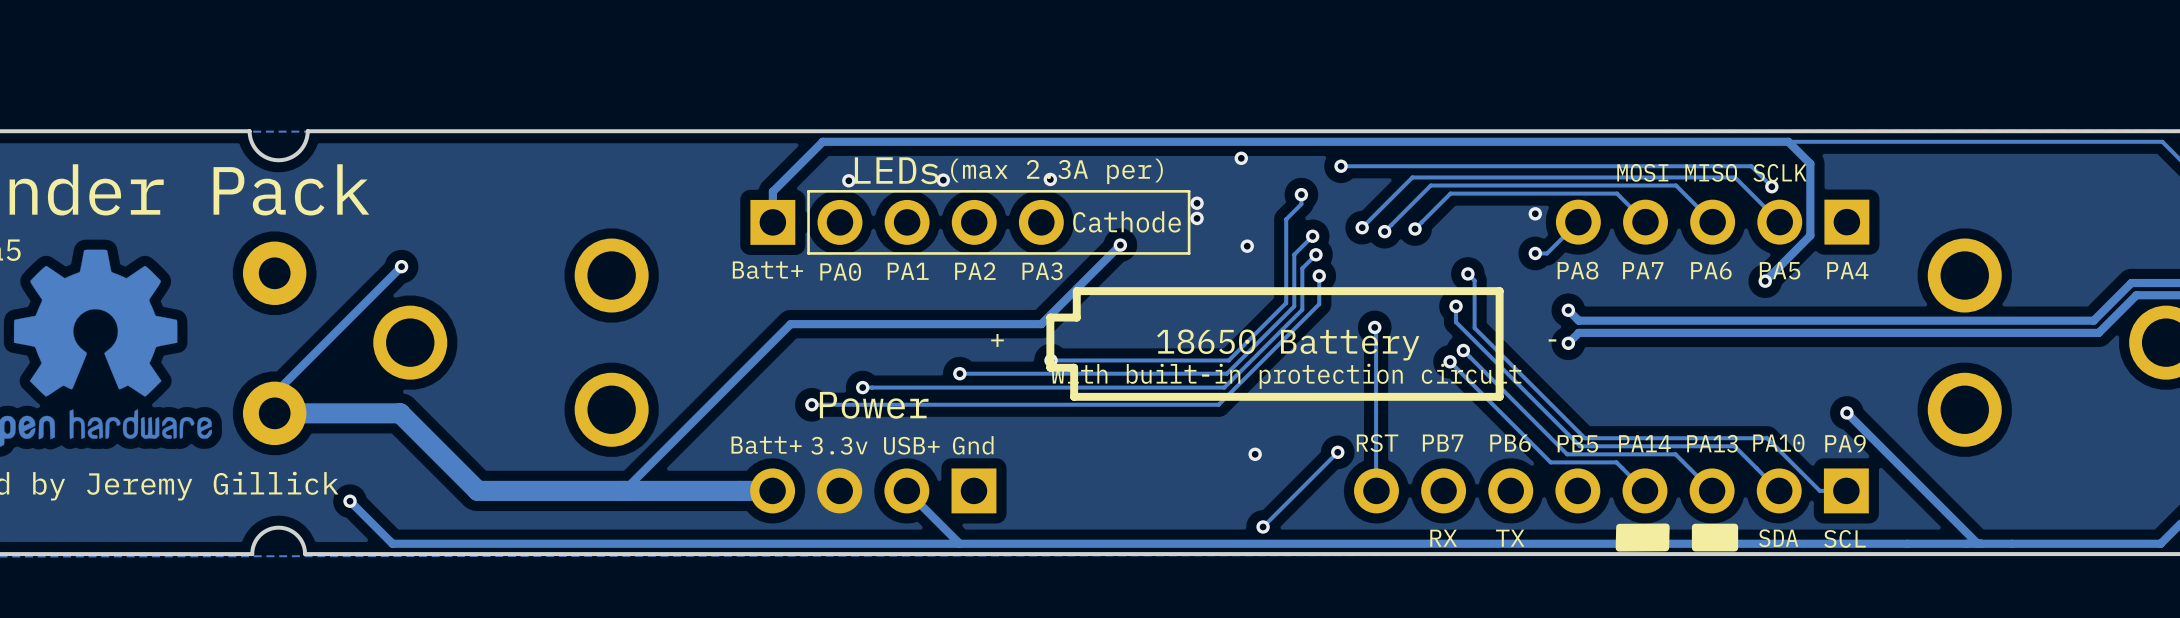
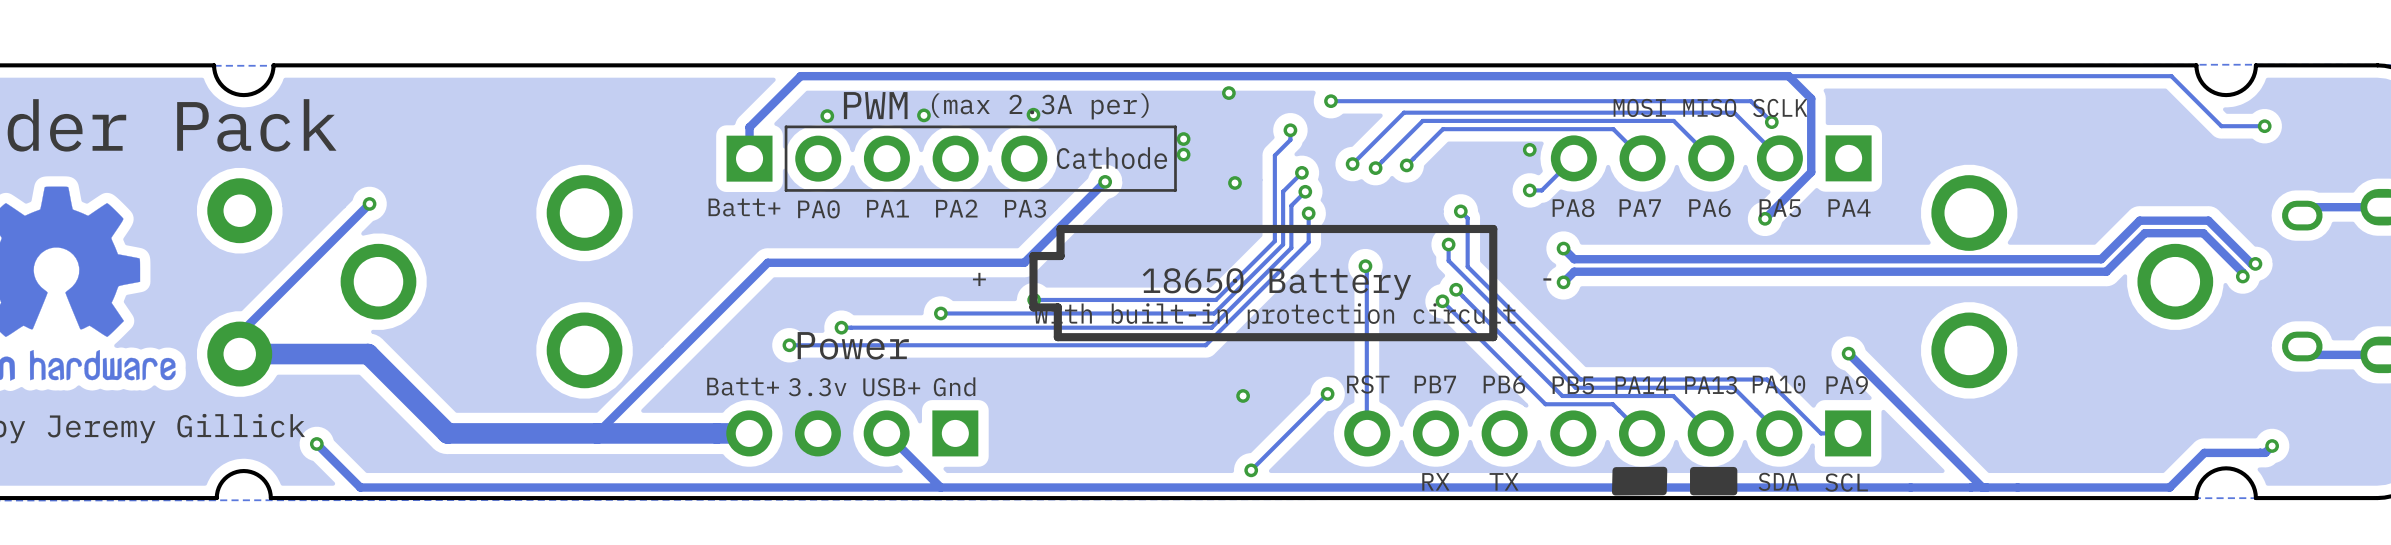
text: LEDs (896, 170) -> PWM (875, 105)

